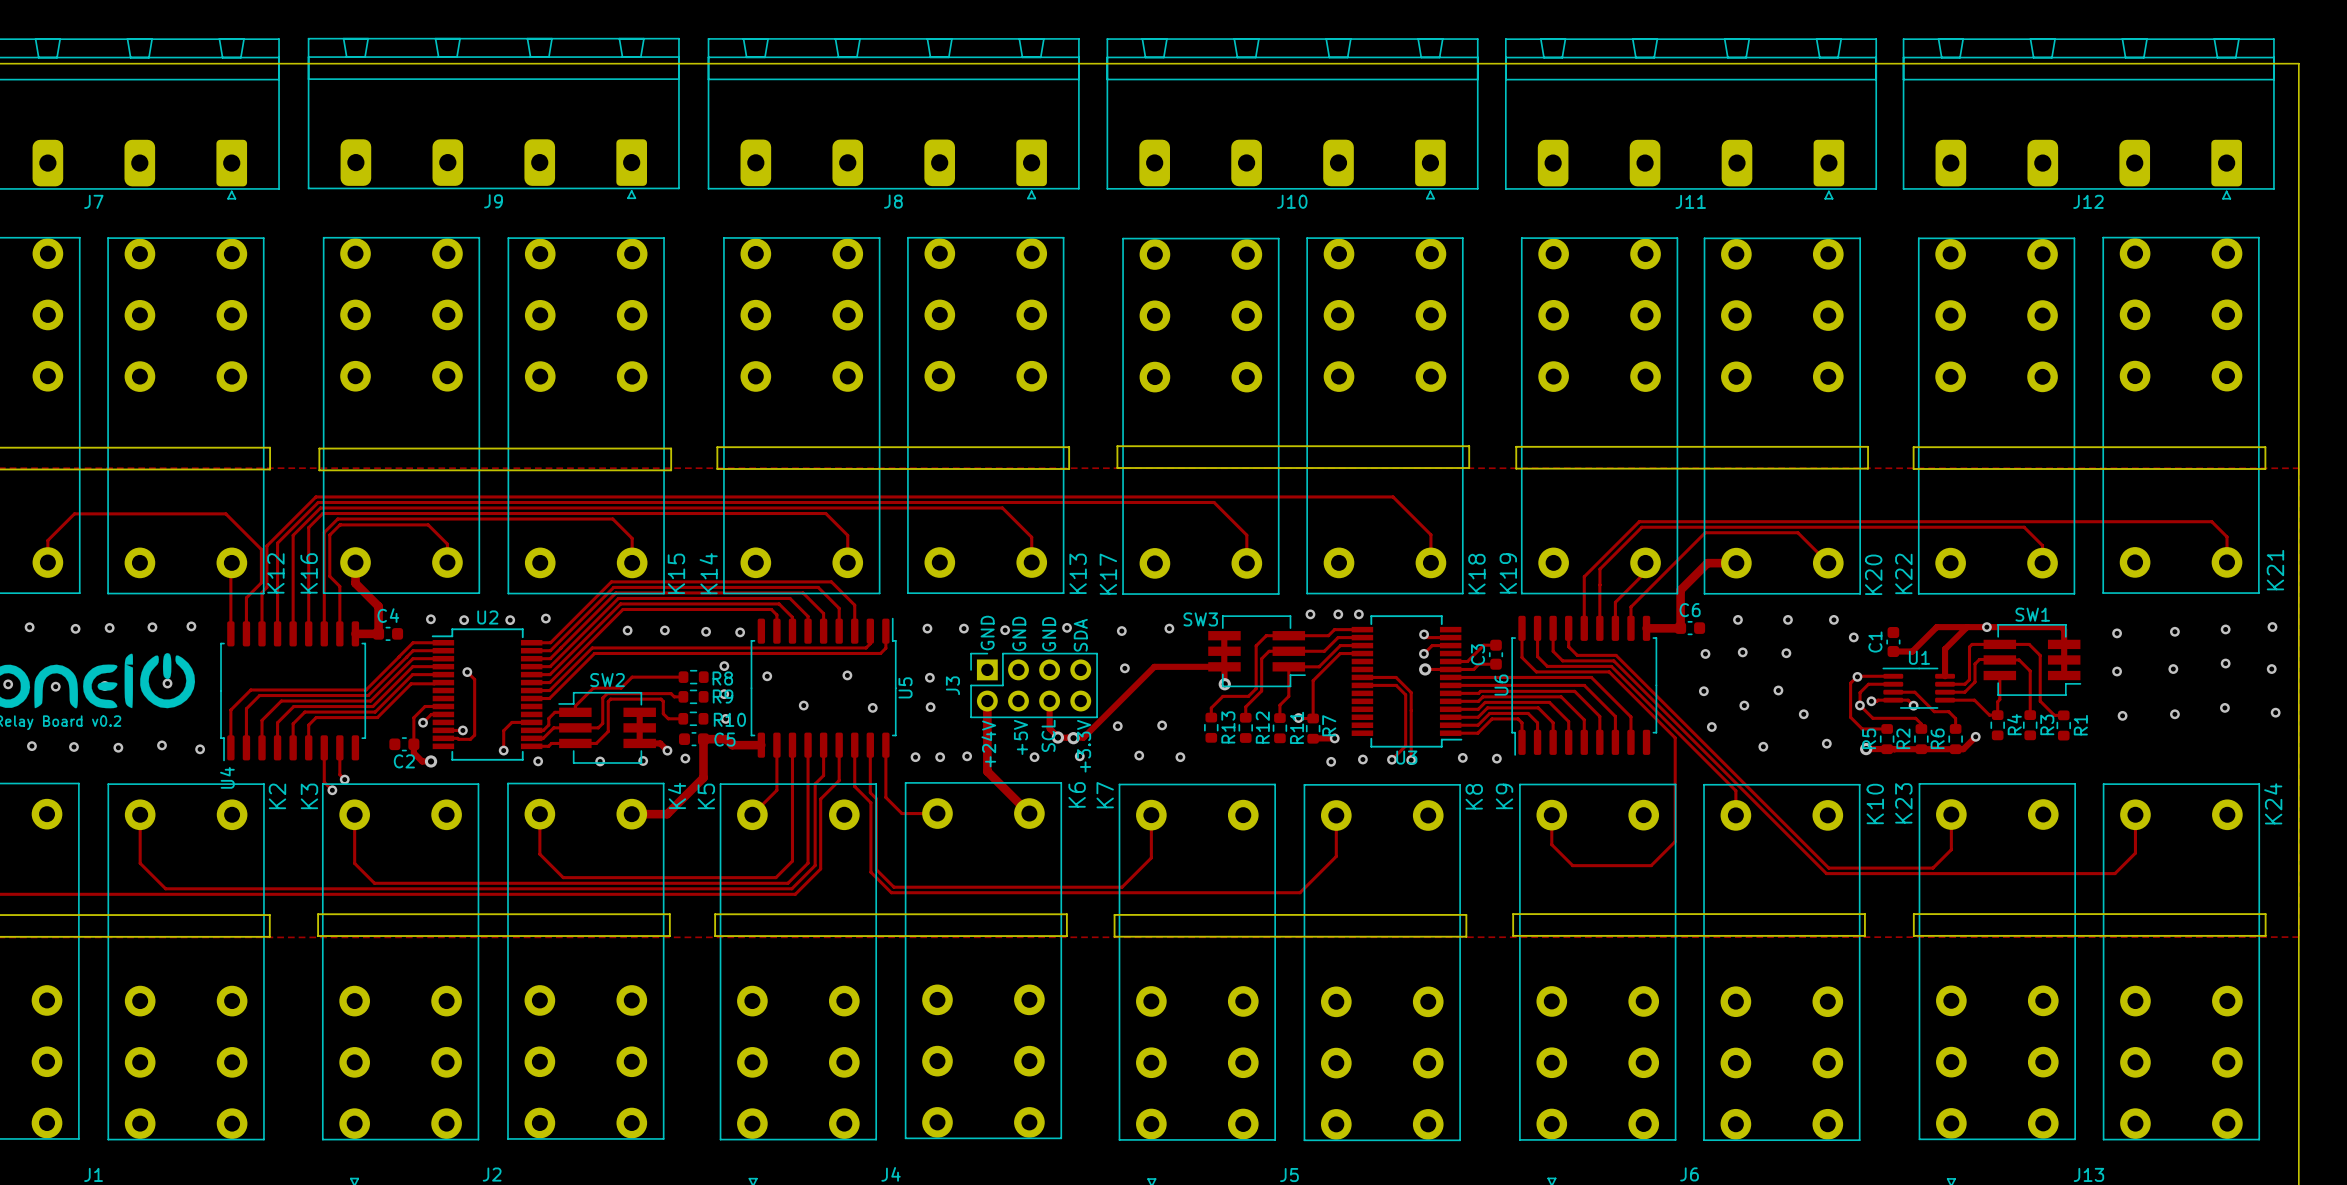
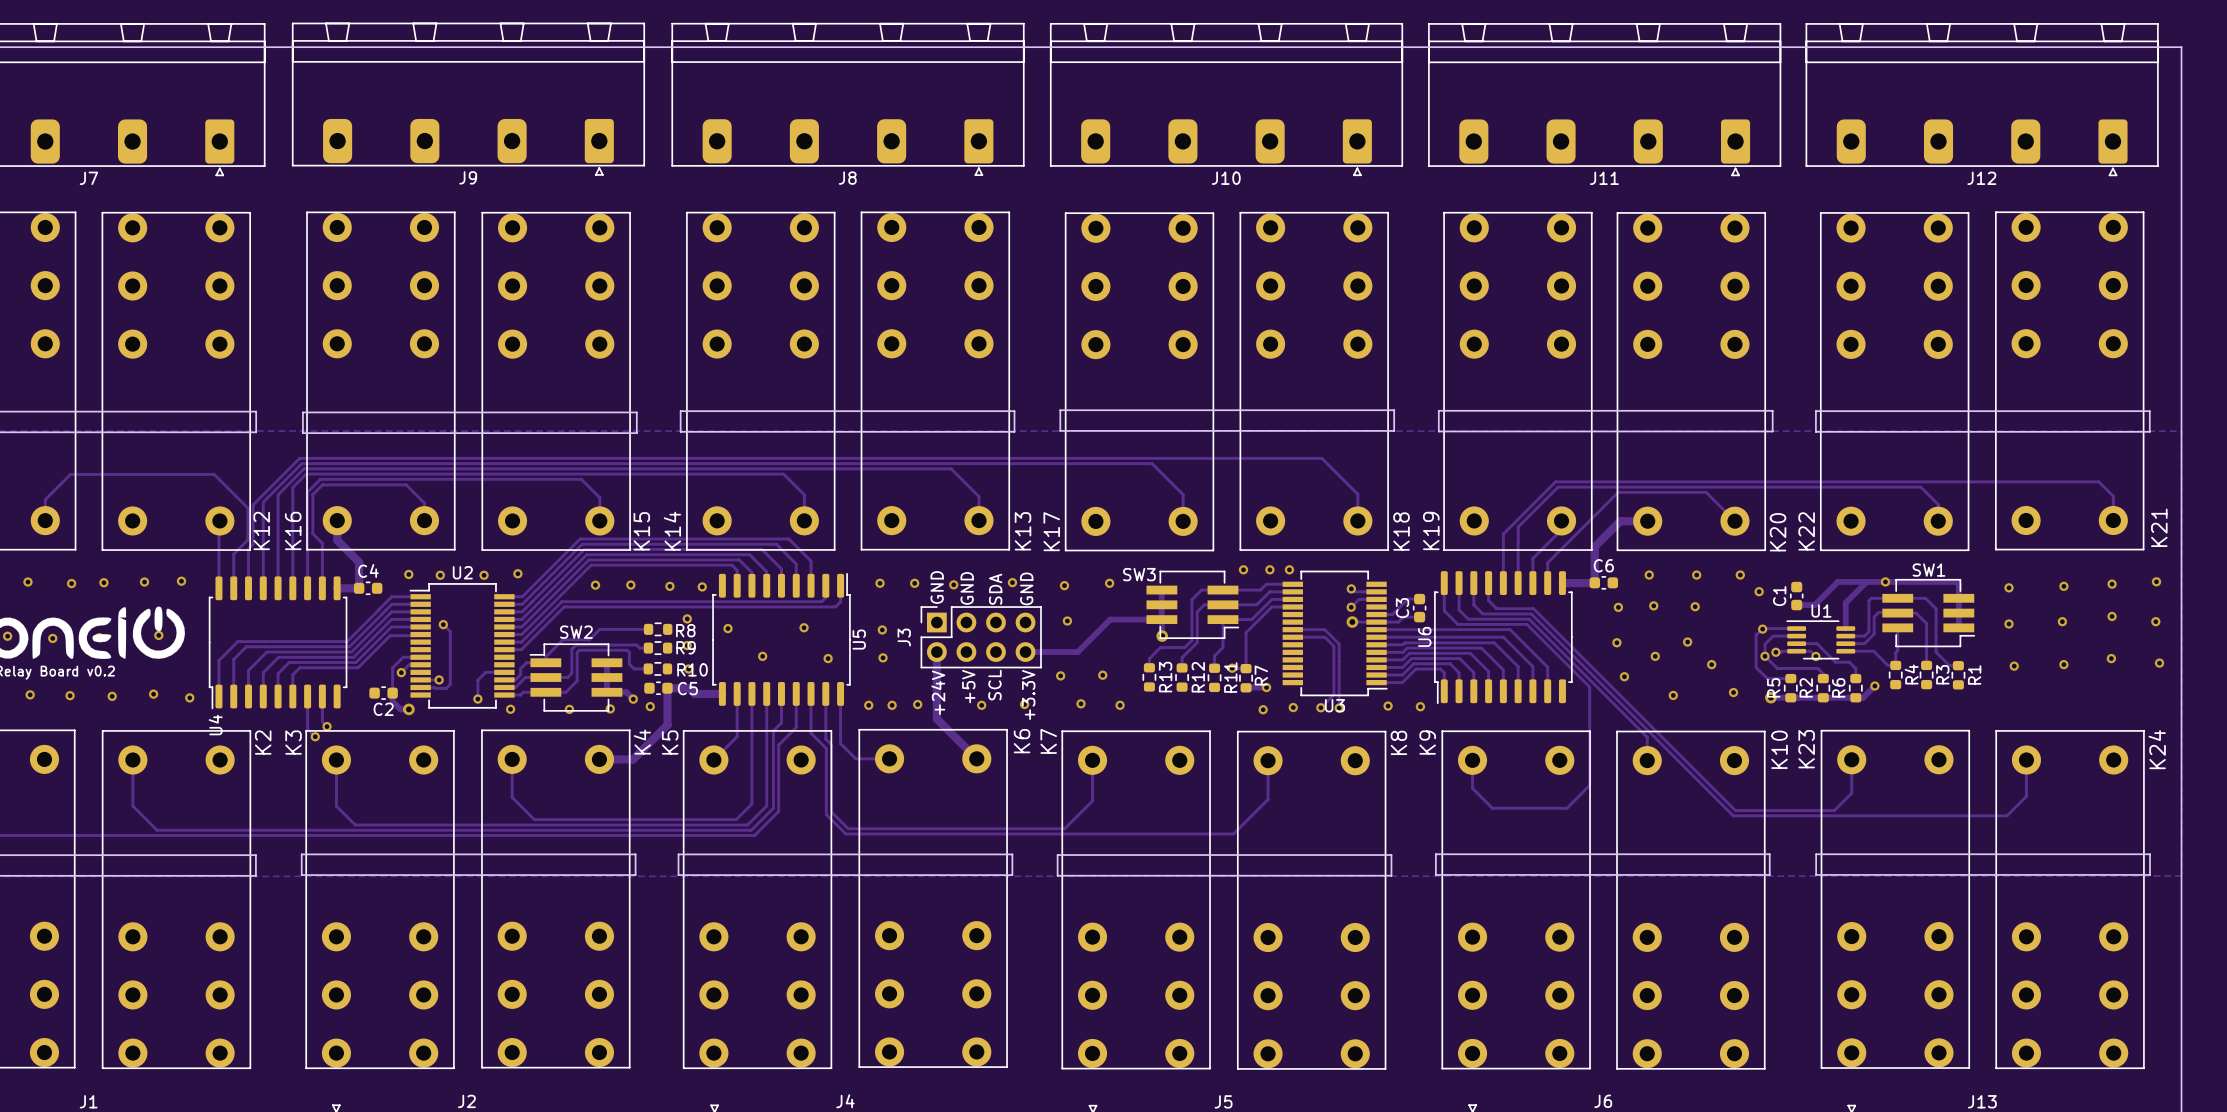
text: GND (1049, 634) -> SDA (995, 589)
text: SDA (1080, 635) -> GND (1026, 588)
track: (1169, 666) (1154, 666) (1083, 737) (1058, 737) (1049, 728) (1049, 701) -> (1110, 619) (1077, 652) (1025, 652)
via: (1057, 737) -> none
via: (1073, 738) -> none

